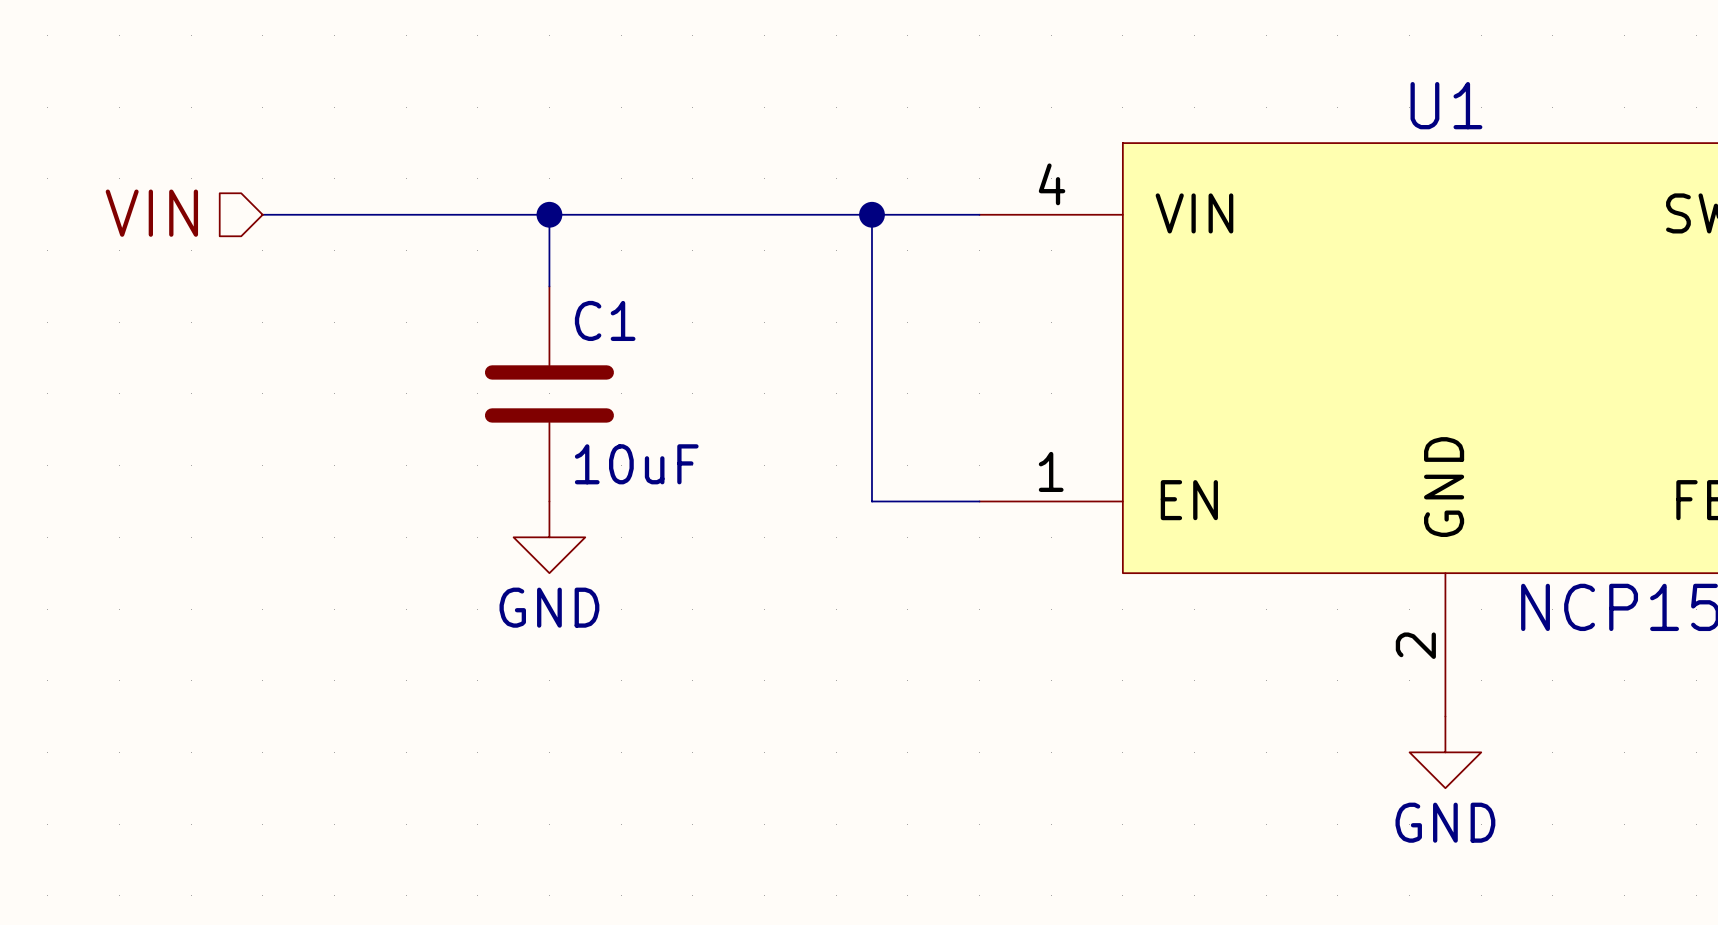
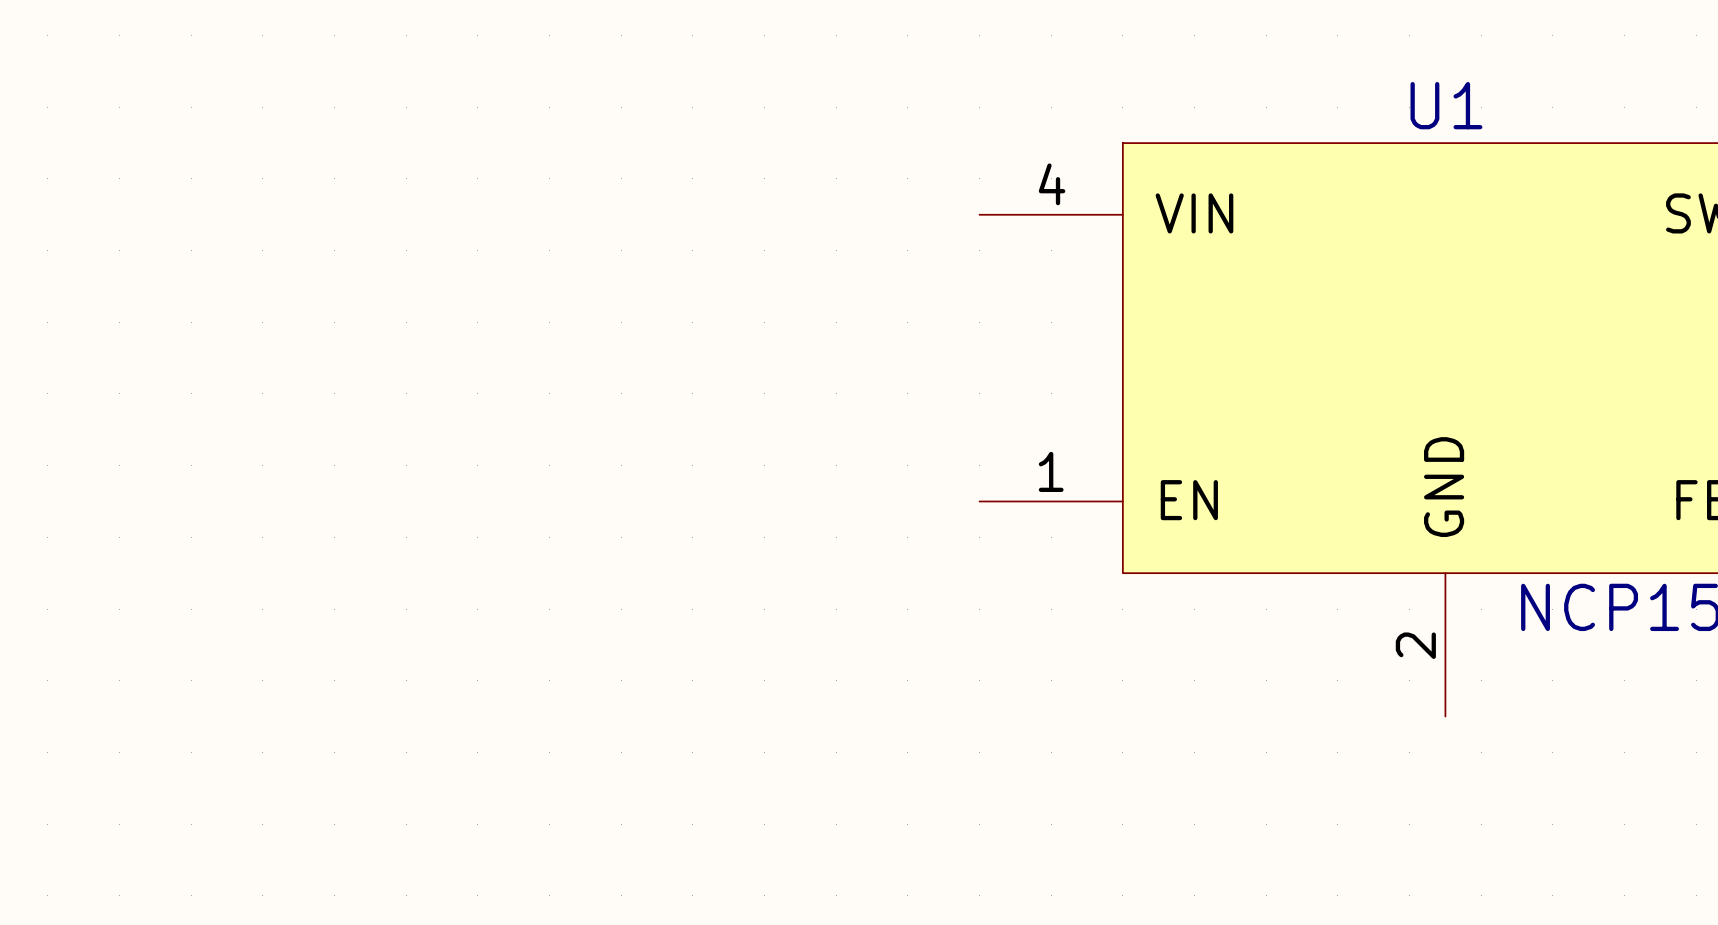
hierarchical label: VIN (151, 213) -> none
wire: (262, 214) (979, 214) -> none
wire: (549, 214) (549, 286) -> none
junction: (549, 214) -> none
wire: (871, 214) (871, 501) (979, 501) -> none
junction: (871, 214) -> none
C1: 10uF (549, 393) -> none
power symbol: GND (549, 537) -> none
power symbol: GND (1445, 752) -> none

